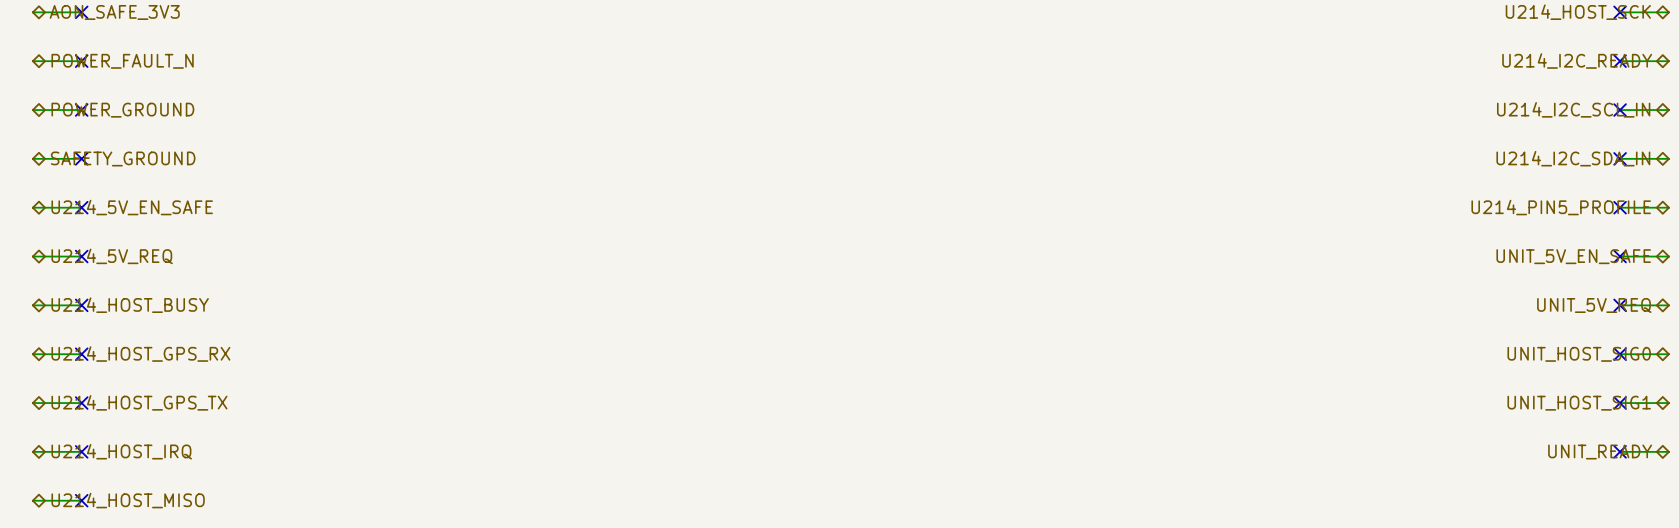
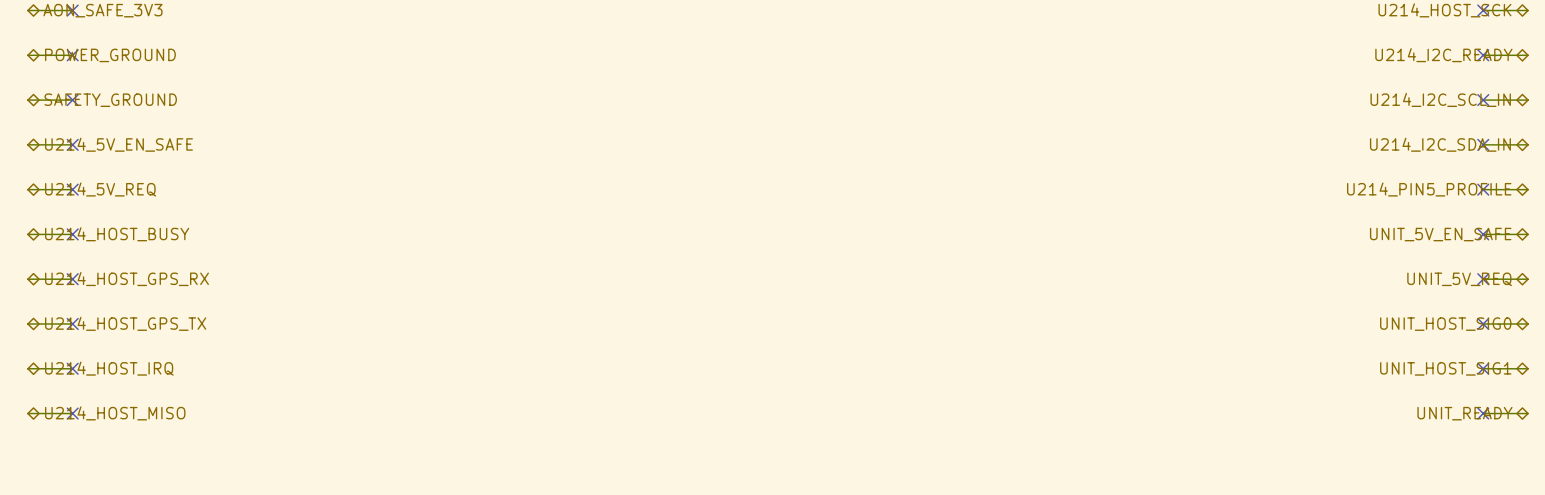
hierarchical label: POWER_FAULT_N (122, 61) -> POWER_GROUND (110, 55)
hierarchical label: POWER_GROUND (122, 110) -> SAFETY_GROUND (110, 100)
hierarchical label: SAFETY_GROUND (123, 158) -> U214_5V_EN_SAFE (118, 144)
hierarchical label: U214_5V_EN_SAFE (132, 207) -> U214_5V_REQ (100, 189)
hierarchical label: U214_5V_REQ (112, 256) -> U214_HOST_BUSY (117, 234)
hierarchical label: U214_HOST_BUSY (130, 305) -> U214_HOST_GPS_RX (126, 279)
hierarchical label: U214_HOST_GPS_RX (140, 354) -> U214_HOST_GPS_TX (125, 323)
hierarchical label: U214_HOST_GPS_TX (139, 402) -> U214_HOST_IRQ (109, 368)
hierarchical label: U214_HOST_IRQ (121, 451) -> U214_HOST_MISO (115, 413)
wire: (32, 500) (81, 500) -> none
no-connect mark: (81, 500) -> none
hierarchical label: U214_HOST_MISO (128, 500) -> none

